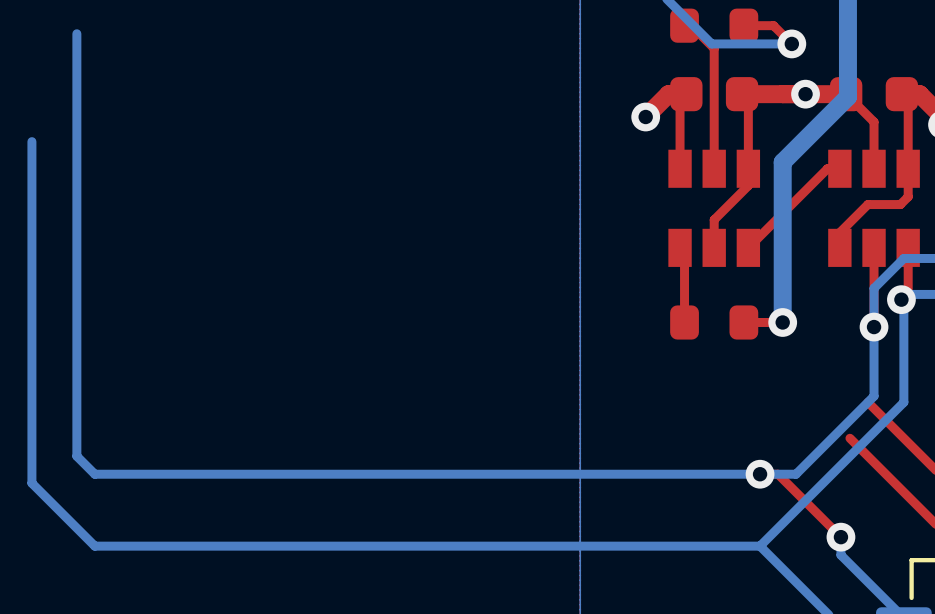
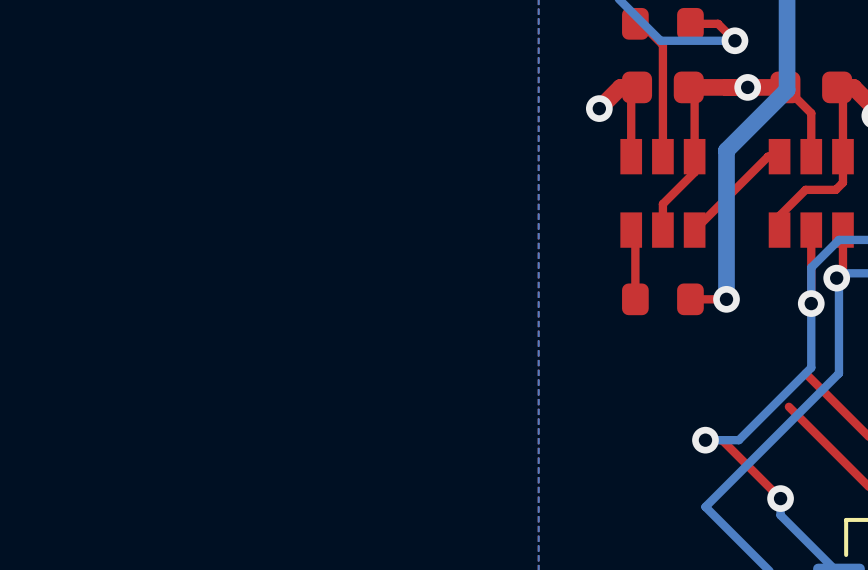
bottom track: (76, 33) (76, 456) (94, 474) (760, 474) -> none
bottom track: (31, 141) (31, 483) (94, 546) (760, 546) -> none

